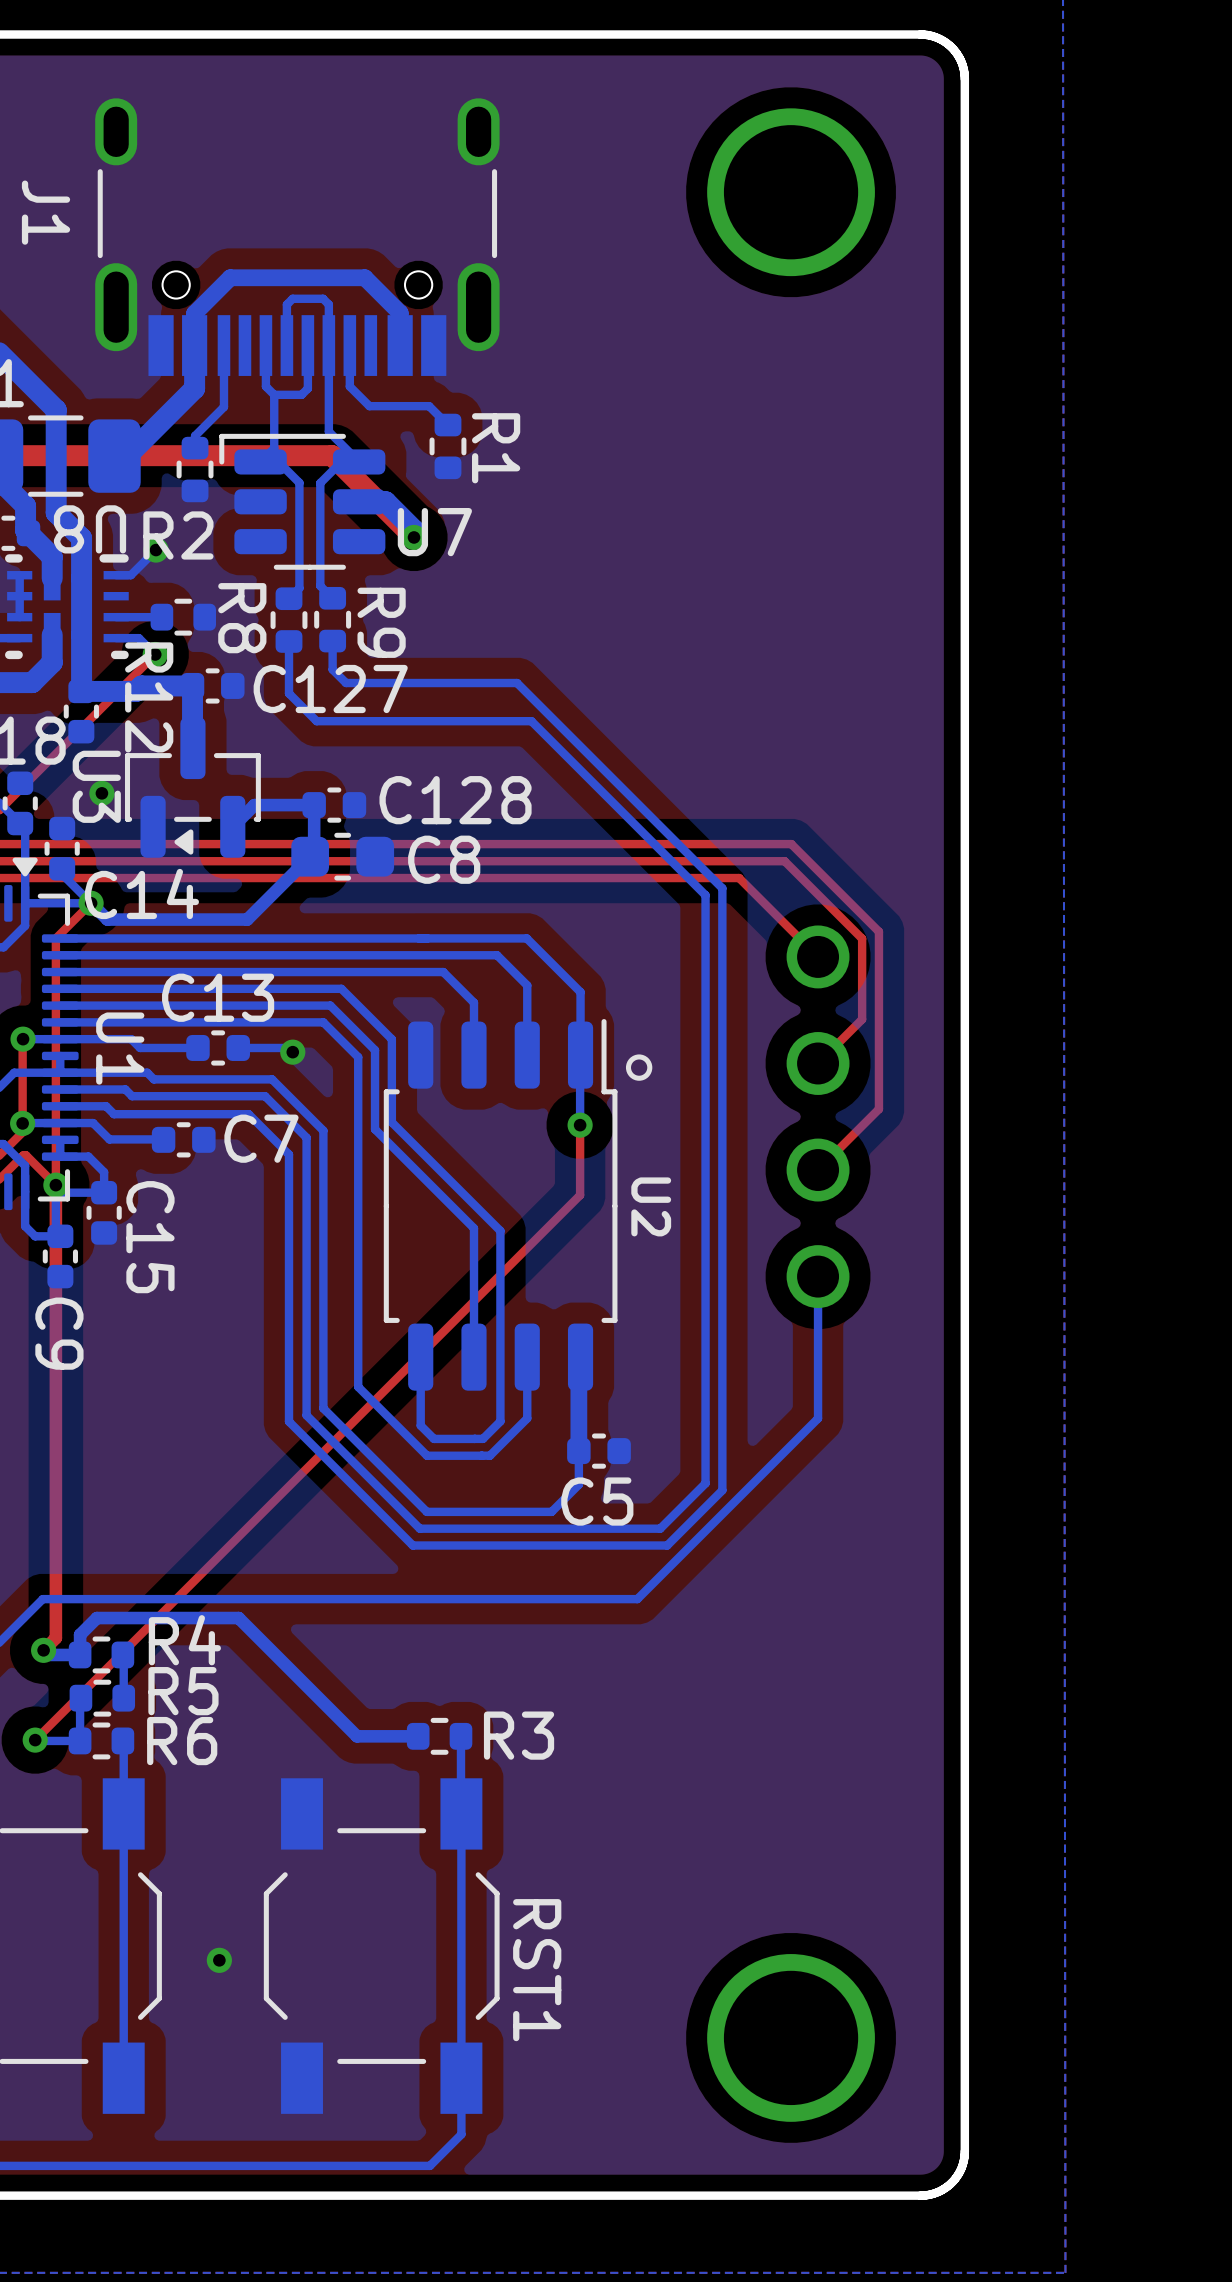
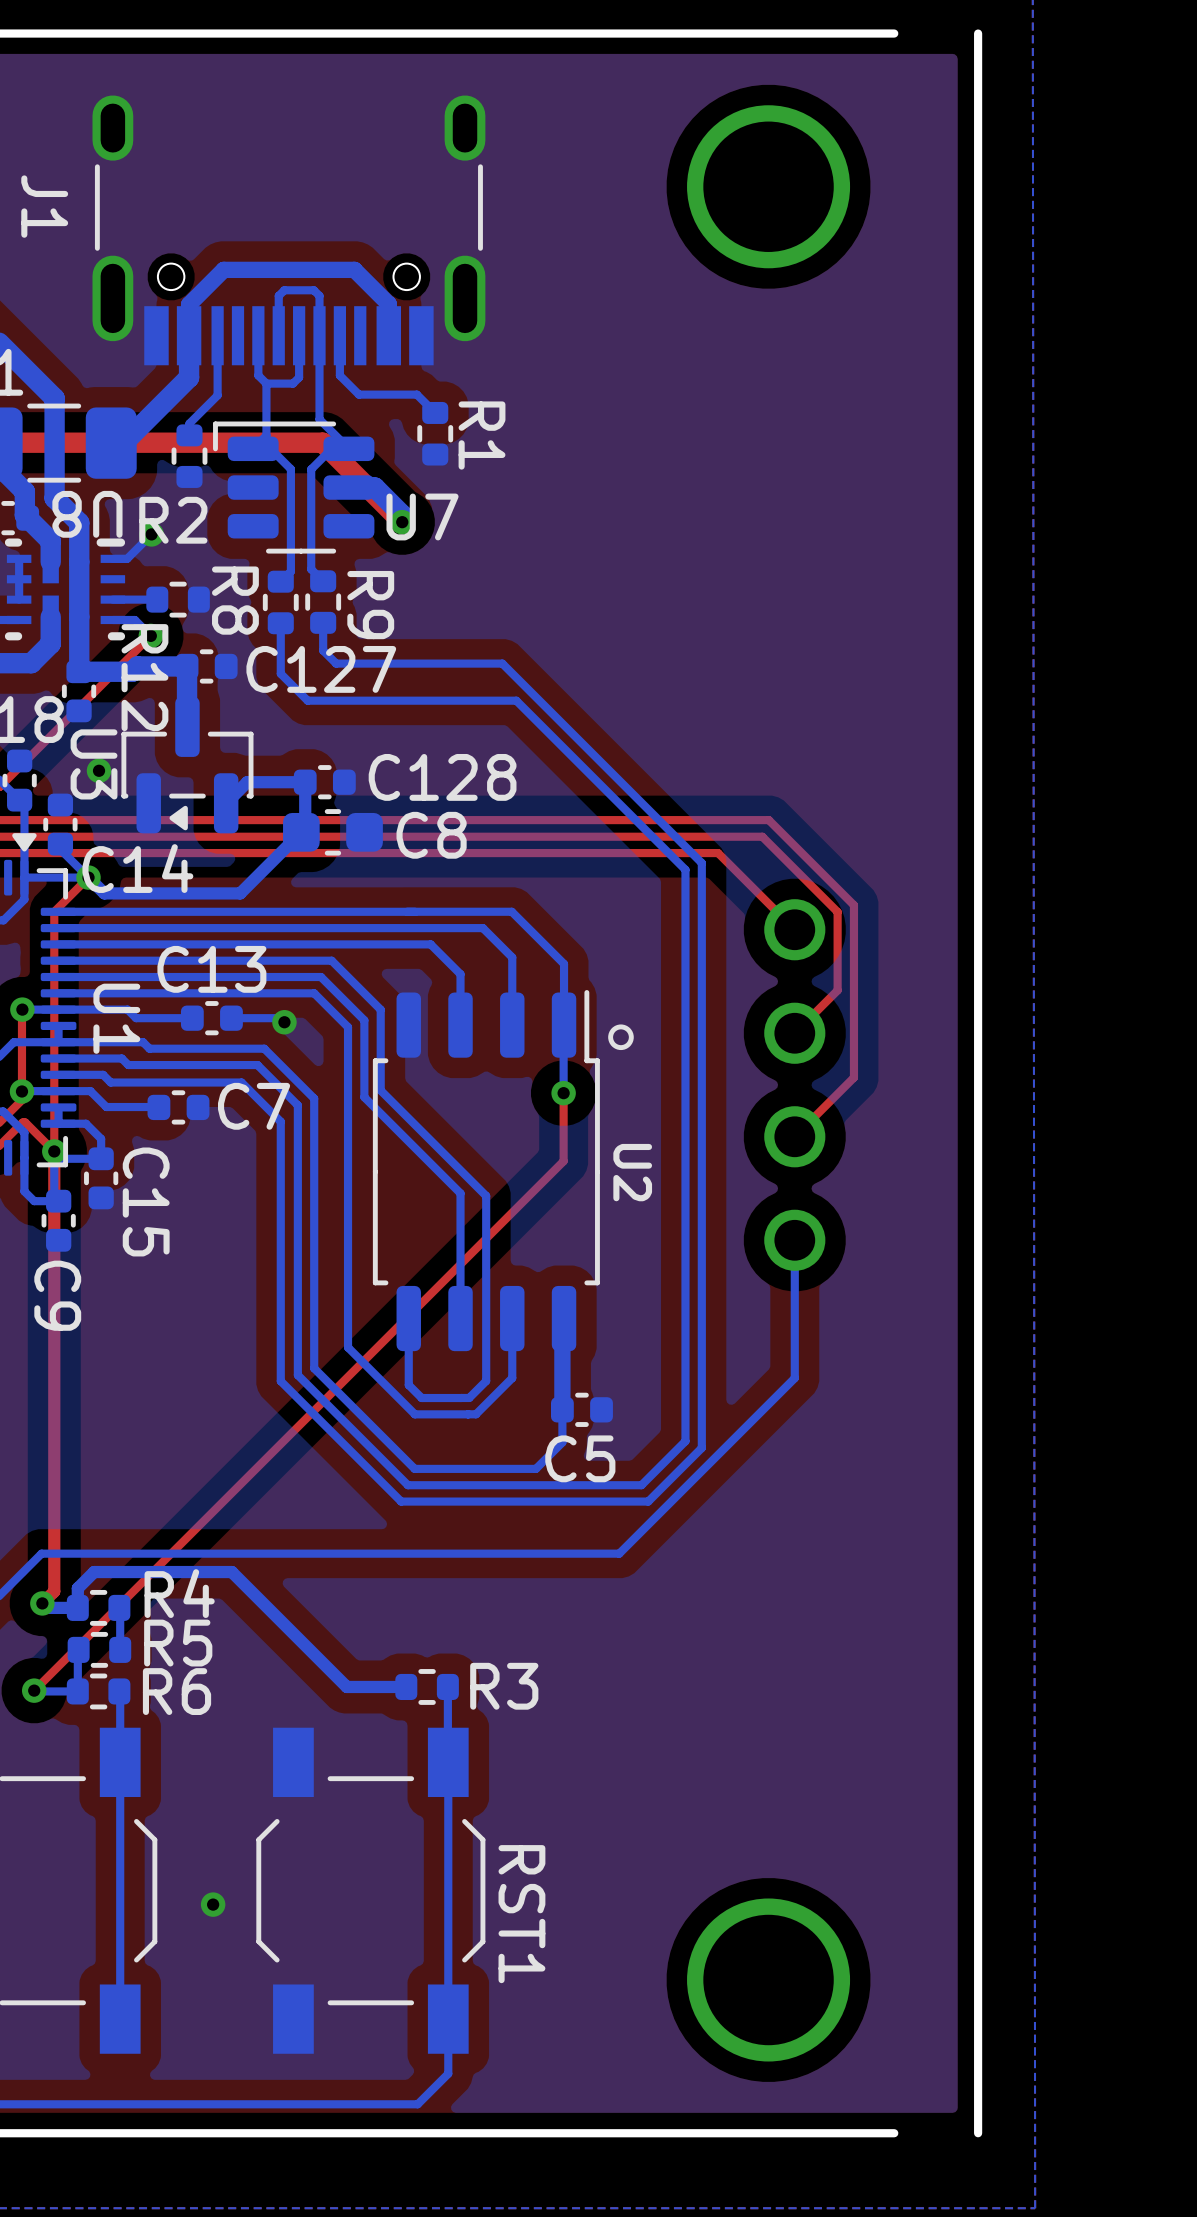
board edge: (920, 34) (937, 38) (951, 47) (961, 61) (964, 78) (964, 2151) (961, 2168) (951, 2182) (937, 2192) (920, 2195) -> none
board edge: none -> (978, 33) (978, 2133)

